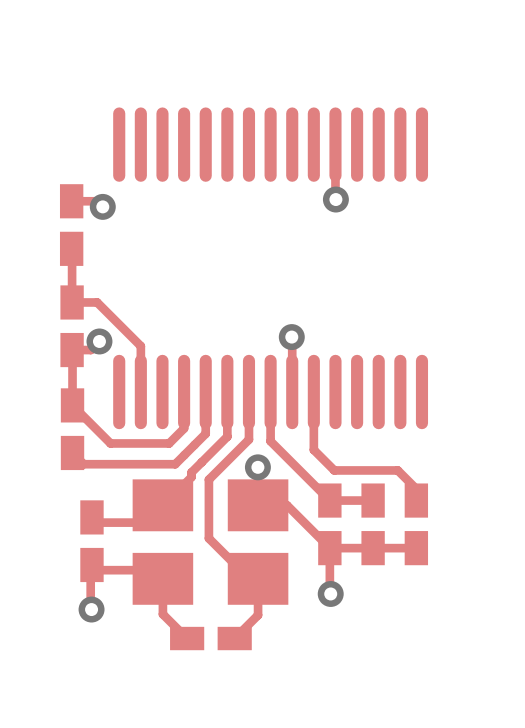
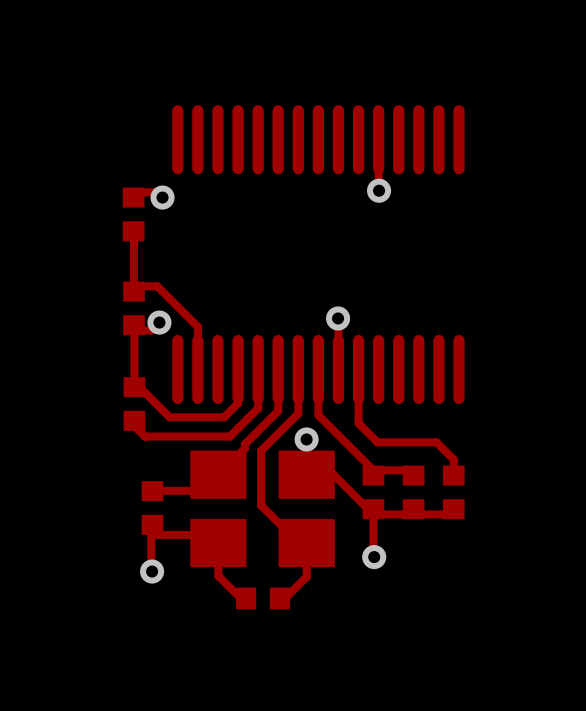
part footprint: [59, 184, 84, 266] -> [122, 187, 145, 242]
part footprint: [60, 285, 84, 368] -> [123, 281, 145, 336]
part footprint: [60, 388, 85, 471] -> [123, 377, 146, 431]
part footprint: [318, 483, 342, 566] -> [362, 465, 385, 520]
part footprint: [361, 483, 385, 566] -> [402, 465, 425, 520]
part footprint: [404, 483, 429, 566] -> [442, 465, 465, 520]
part footprint: [80, 500, 104, 583] -> [141, 481, 164, 535]
part footprint: [170, 626, 252, 651] -> [236, 587, 290, 610]

